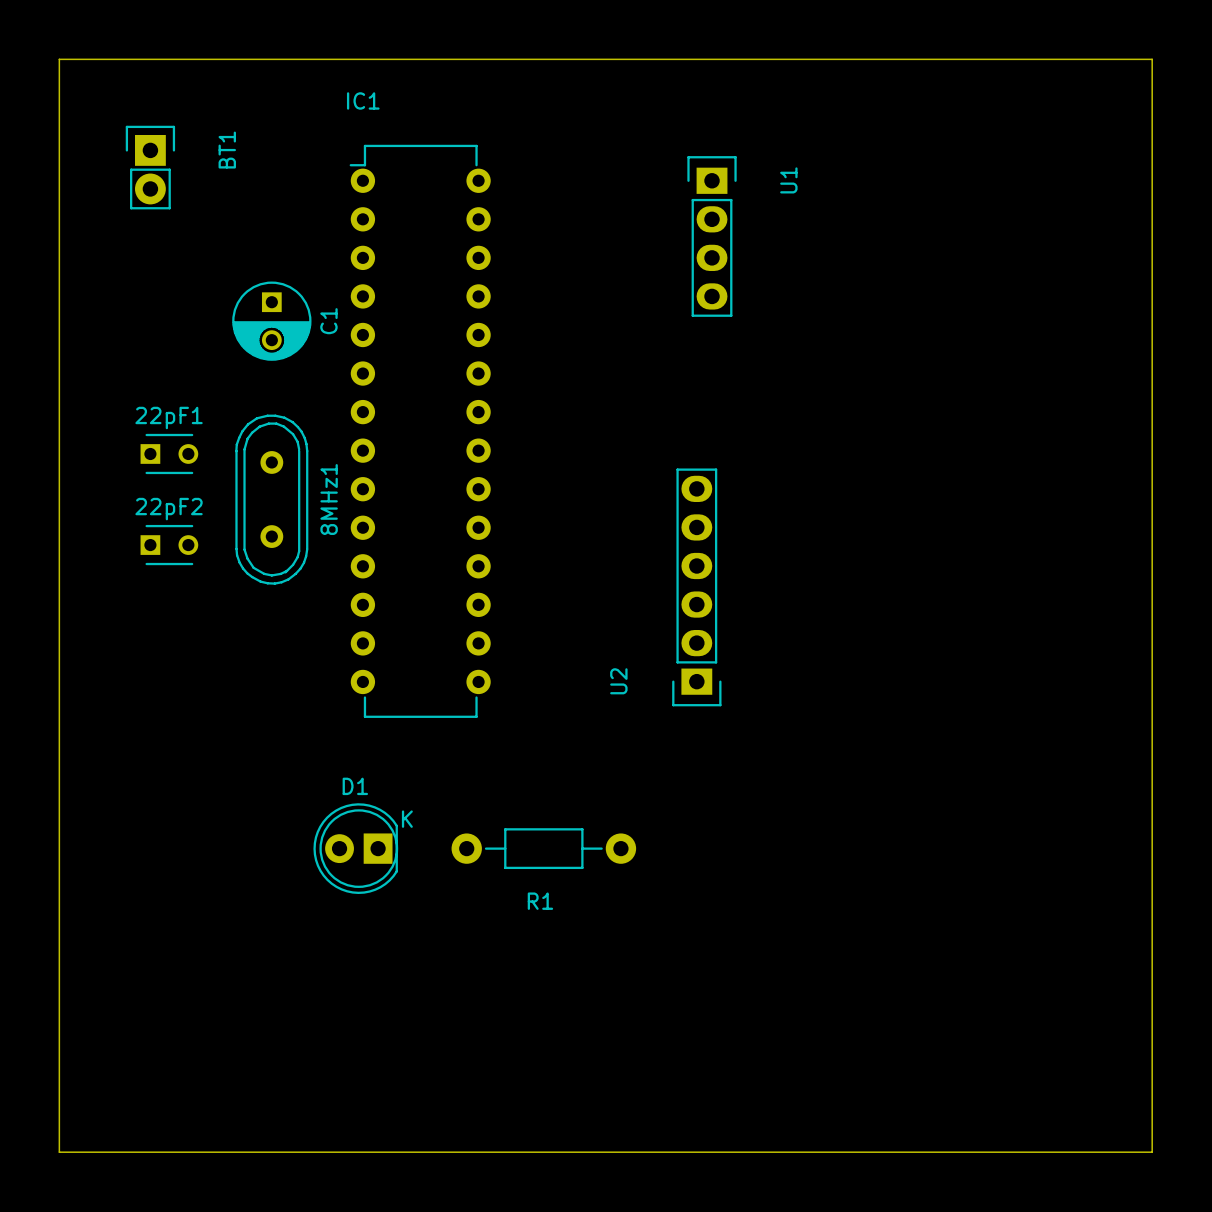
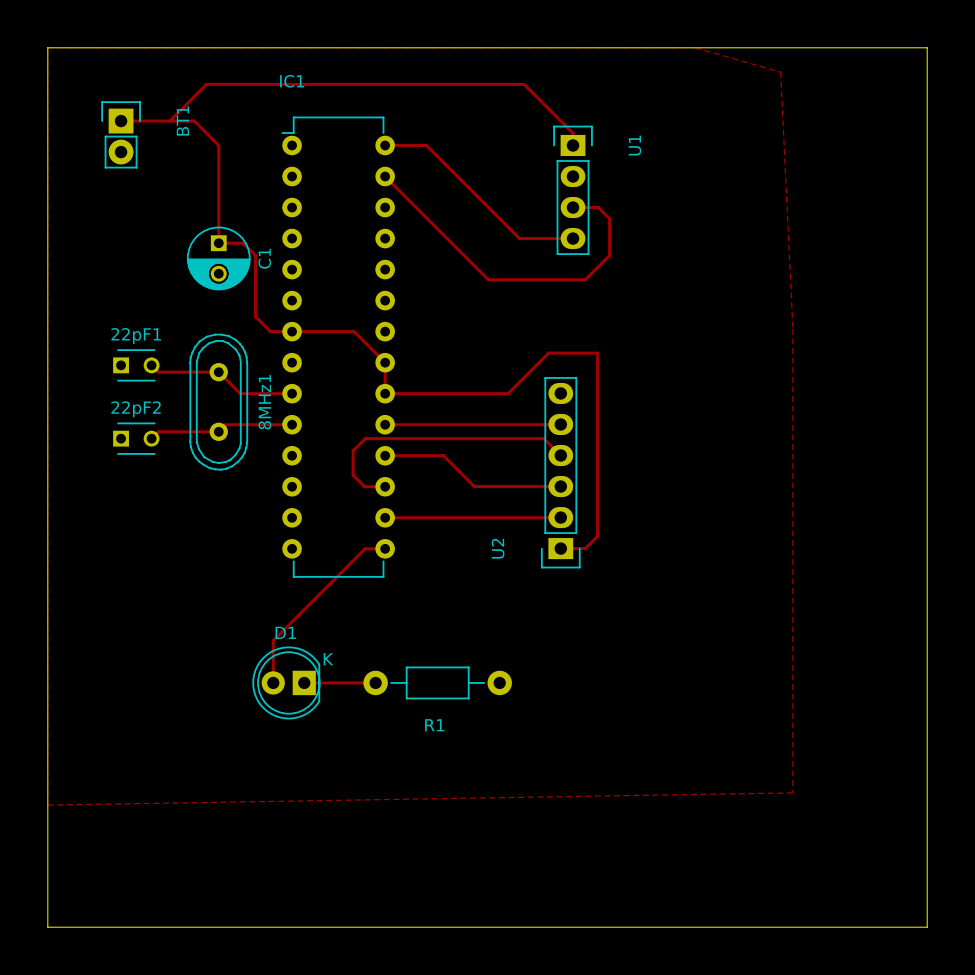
zone outline: none -> (47, 47) (47, 805) (792, 792) (792, 328) (780, 72) (695, 47) (47, 47)
track: none -> (121, 121) (194, 121) (218, 145) (218, 243) (243, 243) (255, 255) (255, 316) (270, 331) (354, 331) (385, 362) (385, 393) (508, 393) (548, 353) (597, 353) (597, 536) (585, 548) (560, 548)
track: none -> (169, 121) (206, 84) (524, 84) (573, 133) (573, 145)
track: none -> (385, 145) (426, 145) (519, 238) (573, 238)
track: none -> (385, 176) (488, 279) (585, 279) (609, 255) (609, 218) (598, 207) (573, 207)
track: none -> (151, 365) (158, 372) (218, 372) (240, 393) (292, 393)
track: none -> (292, 424) (225, 424) (218, 431) (158, 431) (151, 438)
track: none -> (560, 424) (385, 424)
track: none -> (385, 455) (443, 455) (474, 486) (560, 486)
track: none -> (560, 455) (543, 438) (365, 438) (353, 450) (353, 475) (364, 486) (385, 486)
track: none -> (560, 517) (385, 517)
track: none -> (385, 548) (365, 548) (273, 640) (273, 682)
track: none -> (304, 682) (375, 682)

